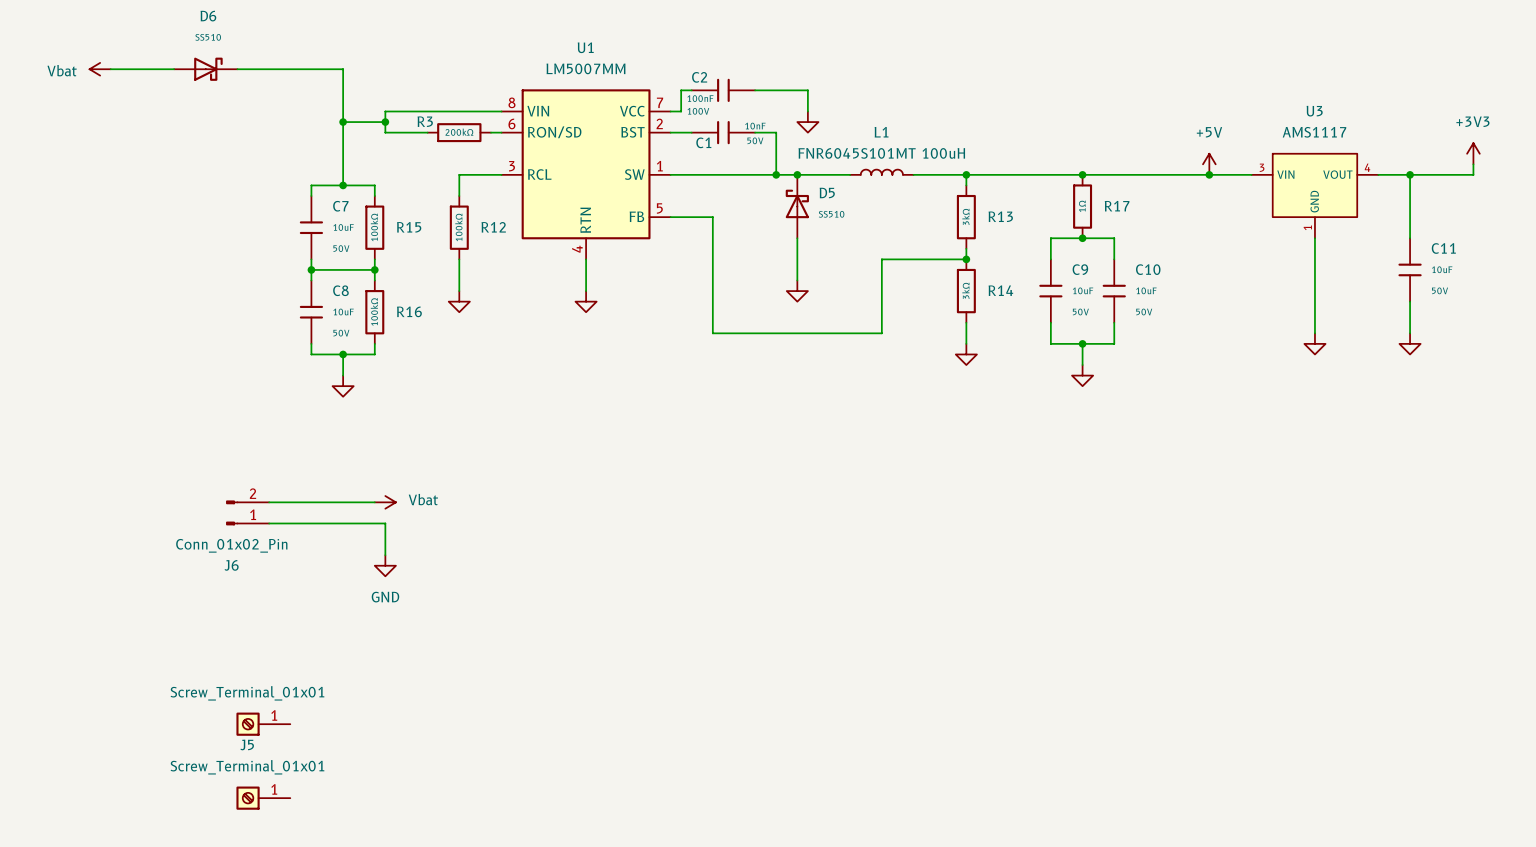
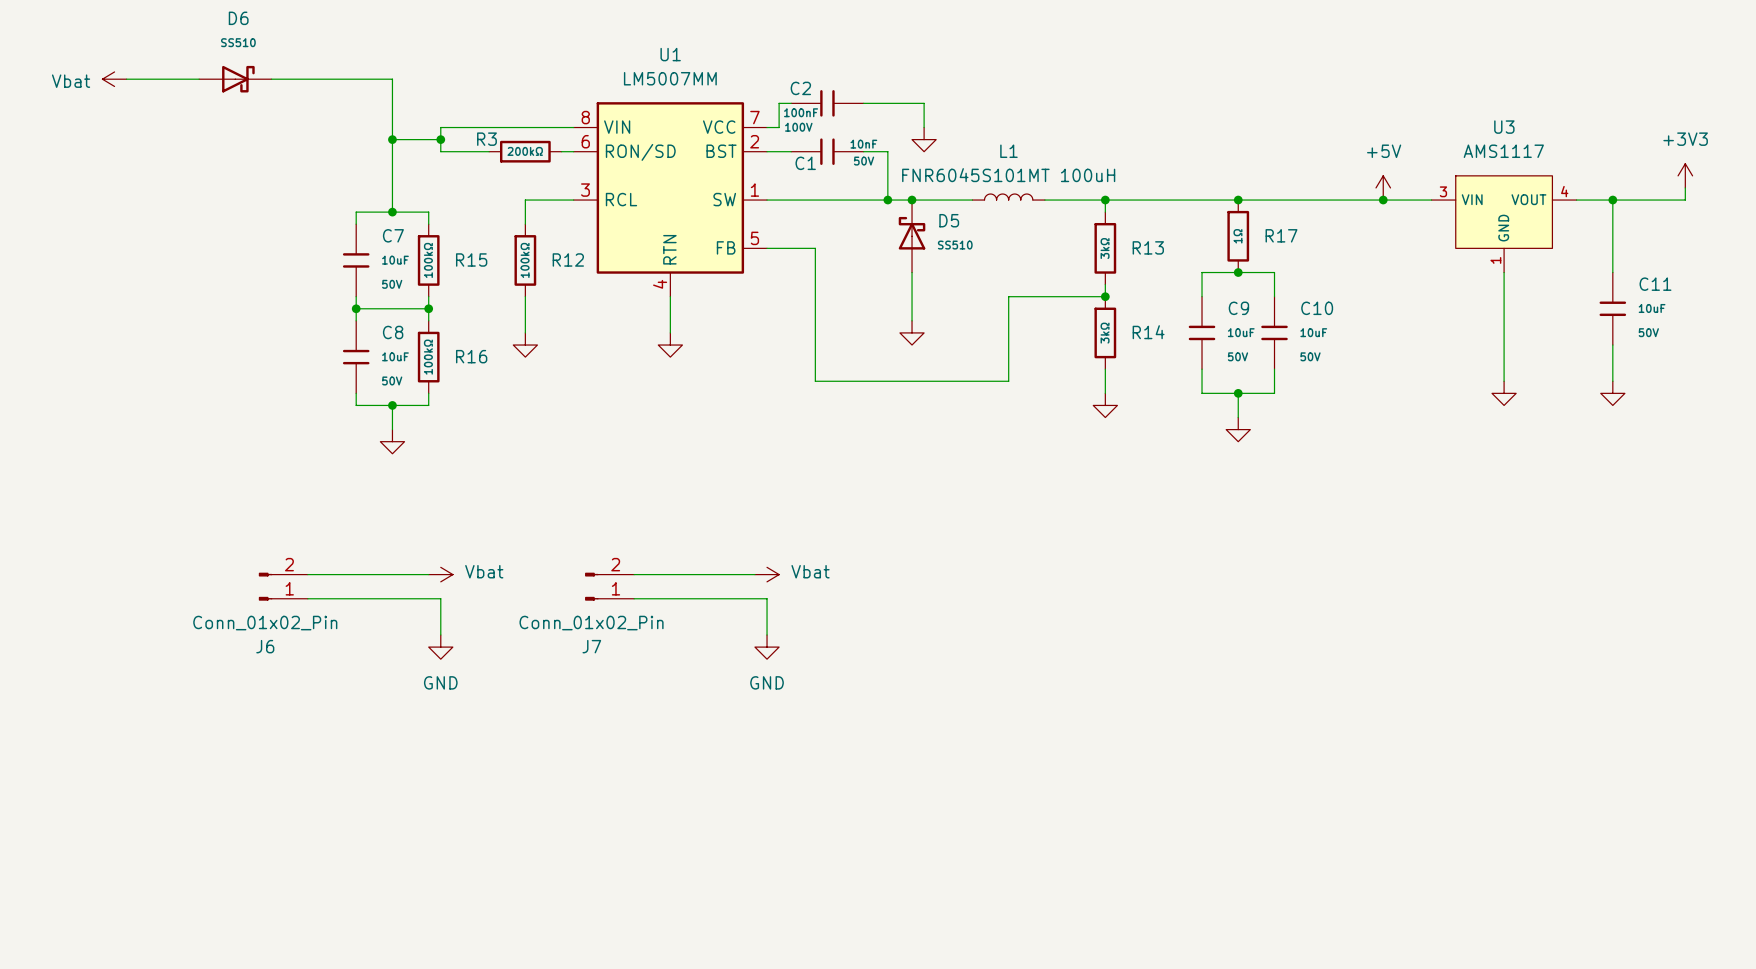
wire: none -> (634, 574) (754, 574)
power symbol: none -> Vbat (767, 574)
J7: none -> Conn_01x02_Pin (609, 586)
wire: none -> (634, 598) (767, 598) (767, 635)
power symbol: none -> GND (767, 647)
part: Screw_Terminal_01x01 (263, 724) -> none
J5: Screw_Terminal_01x01 (263, 798) -> none

